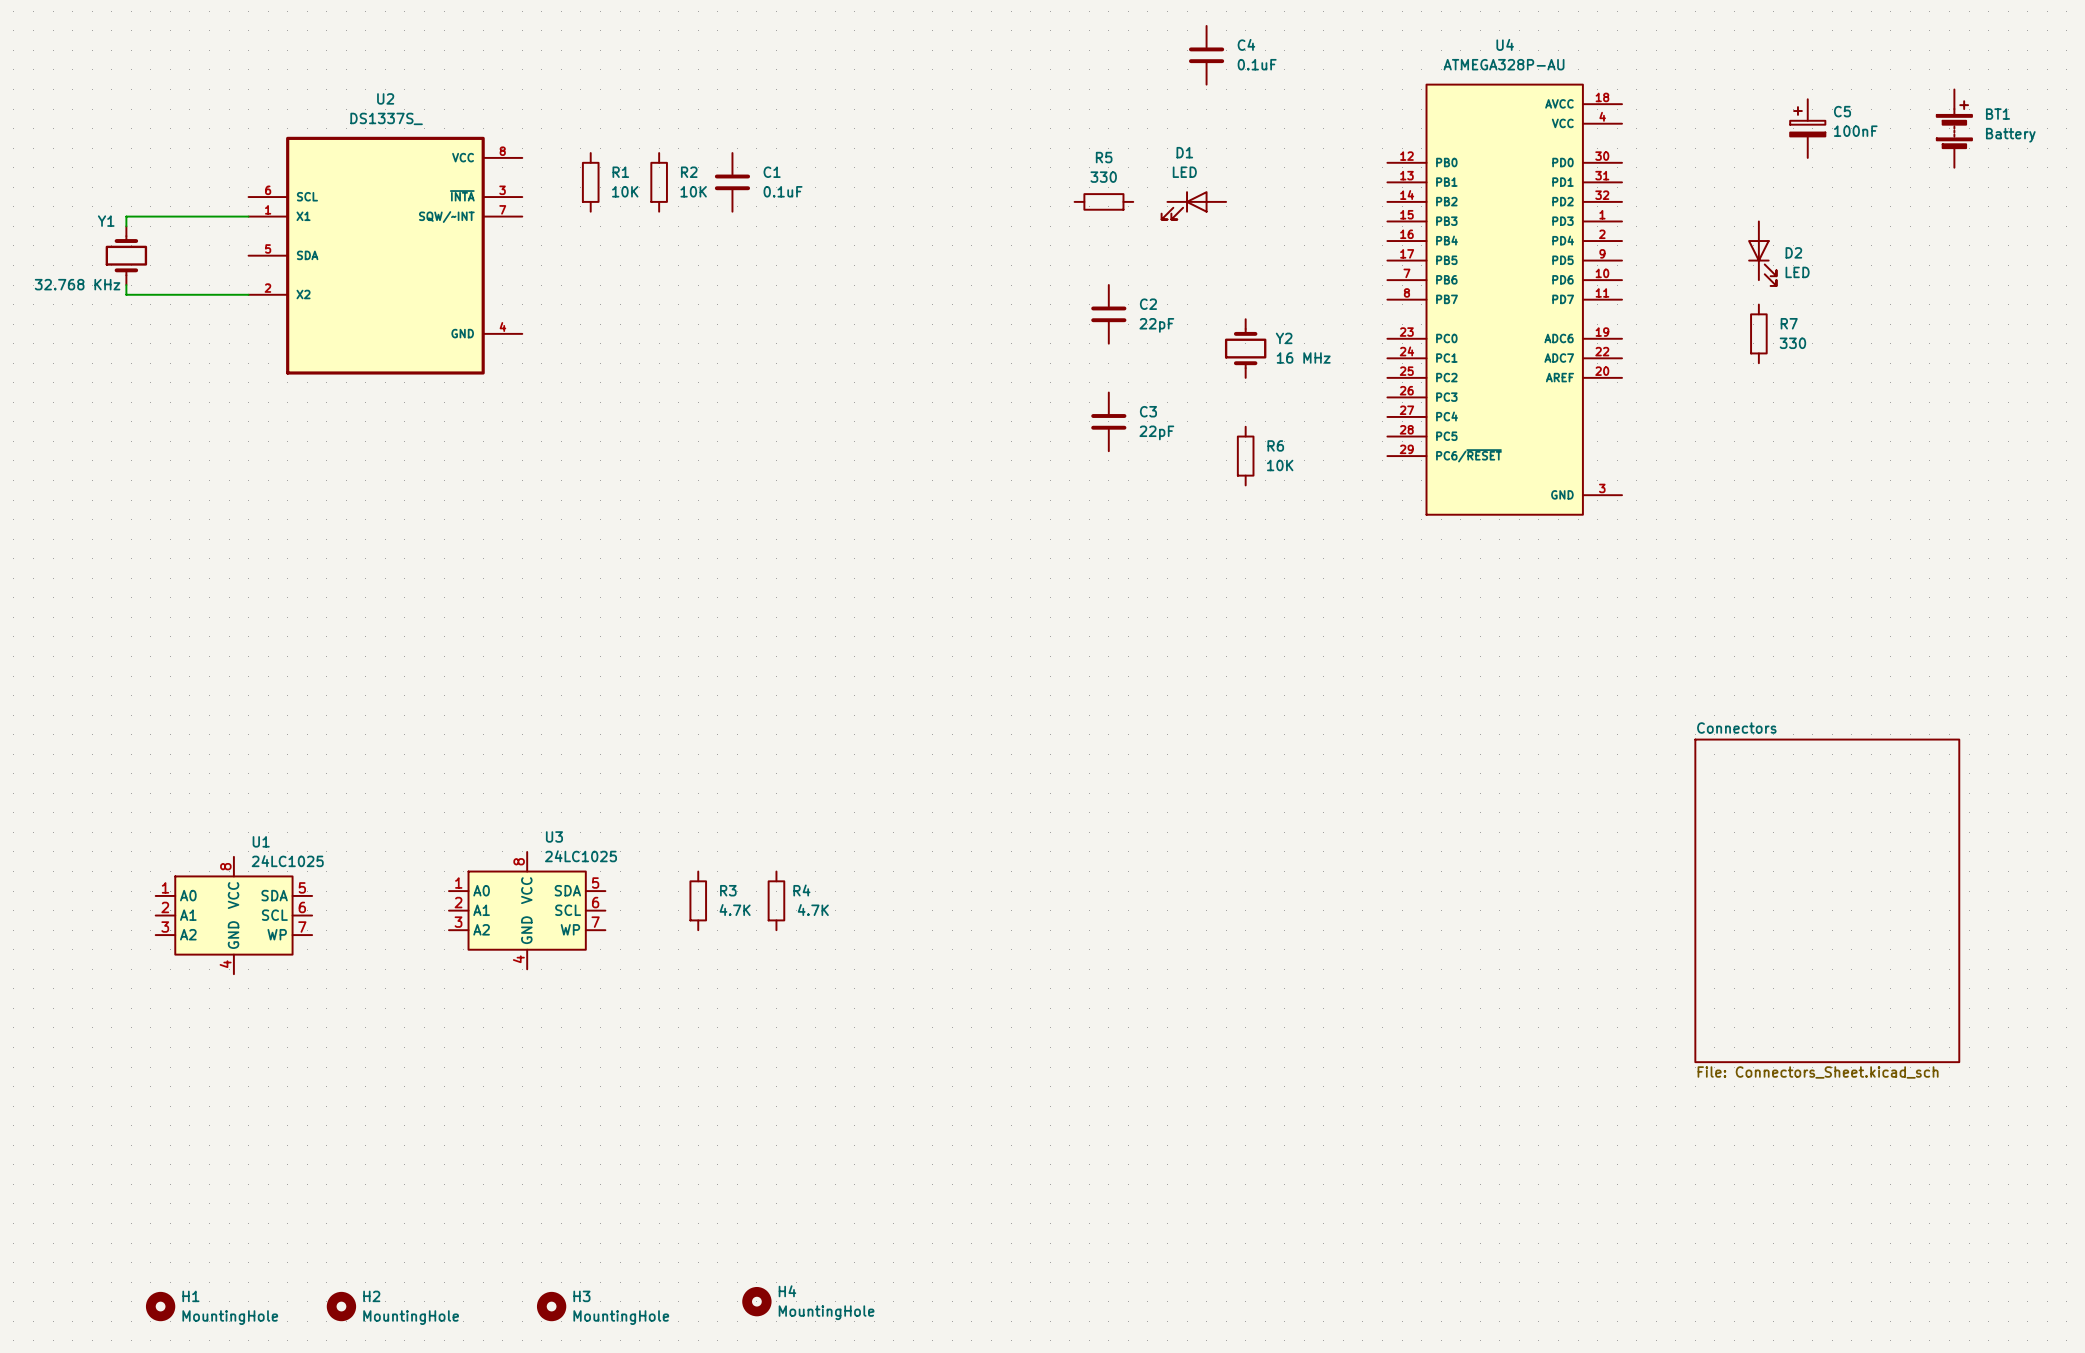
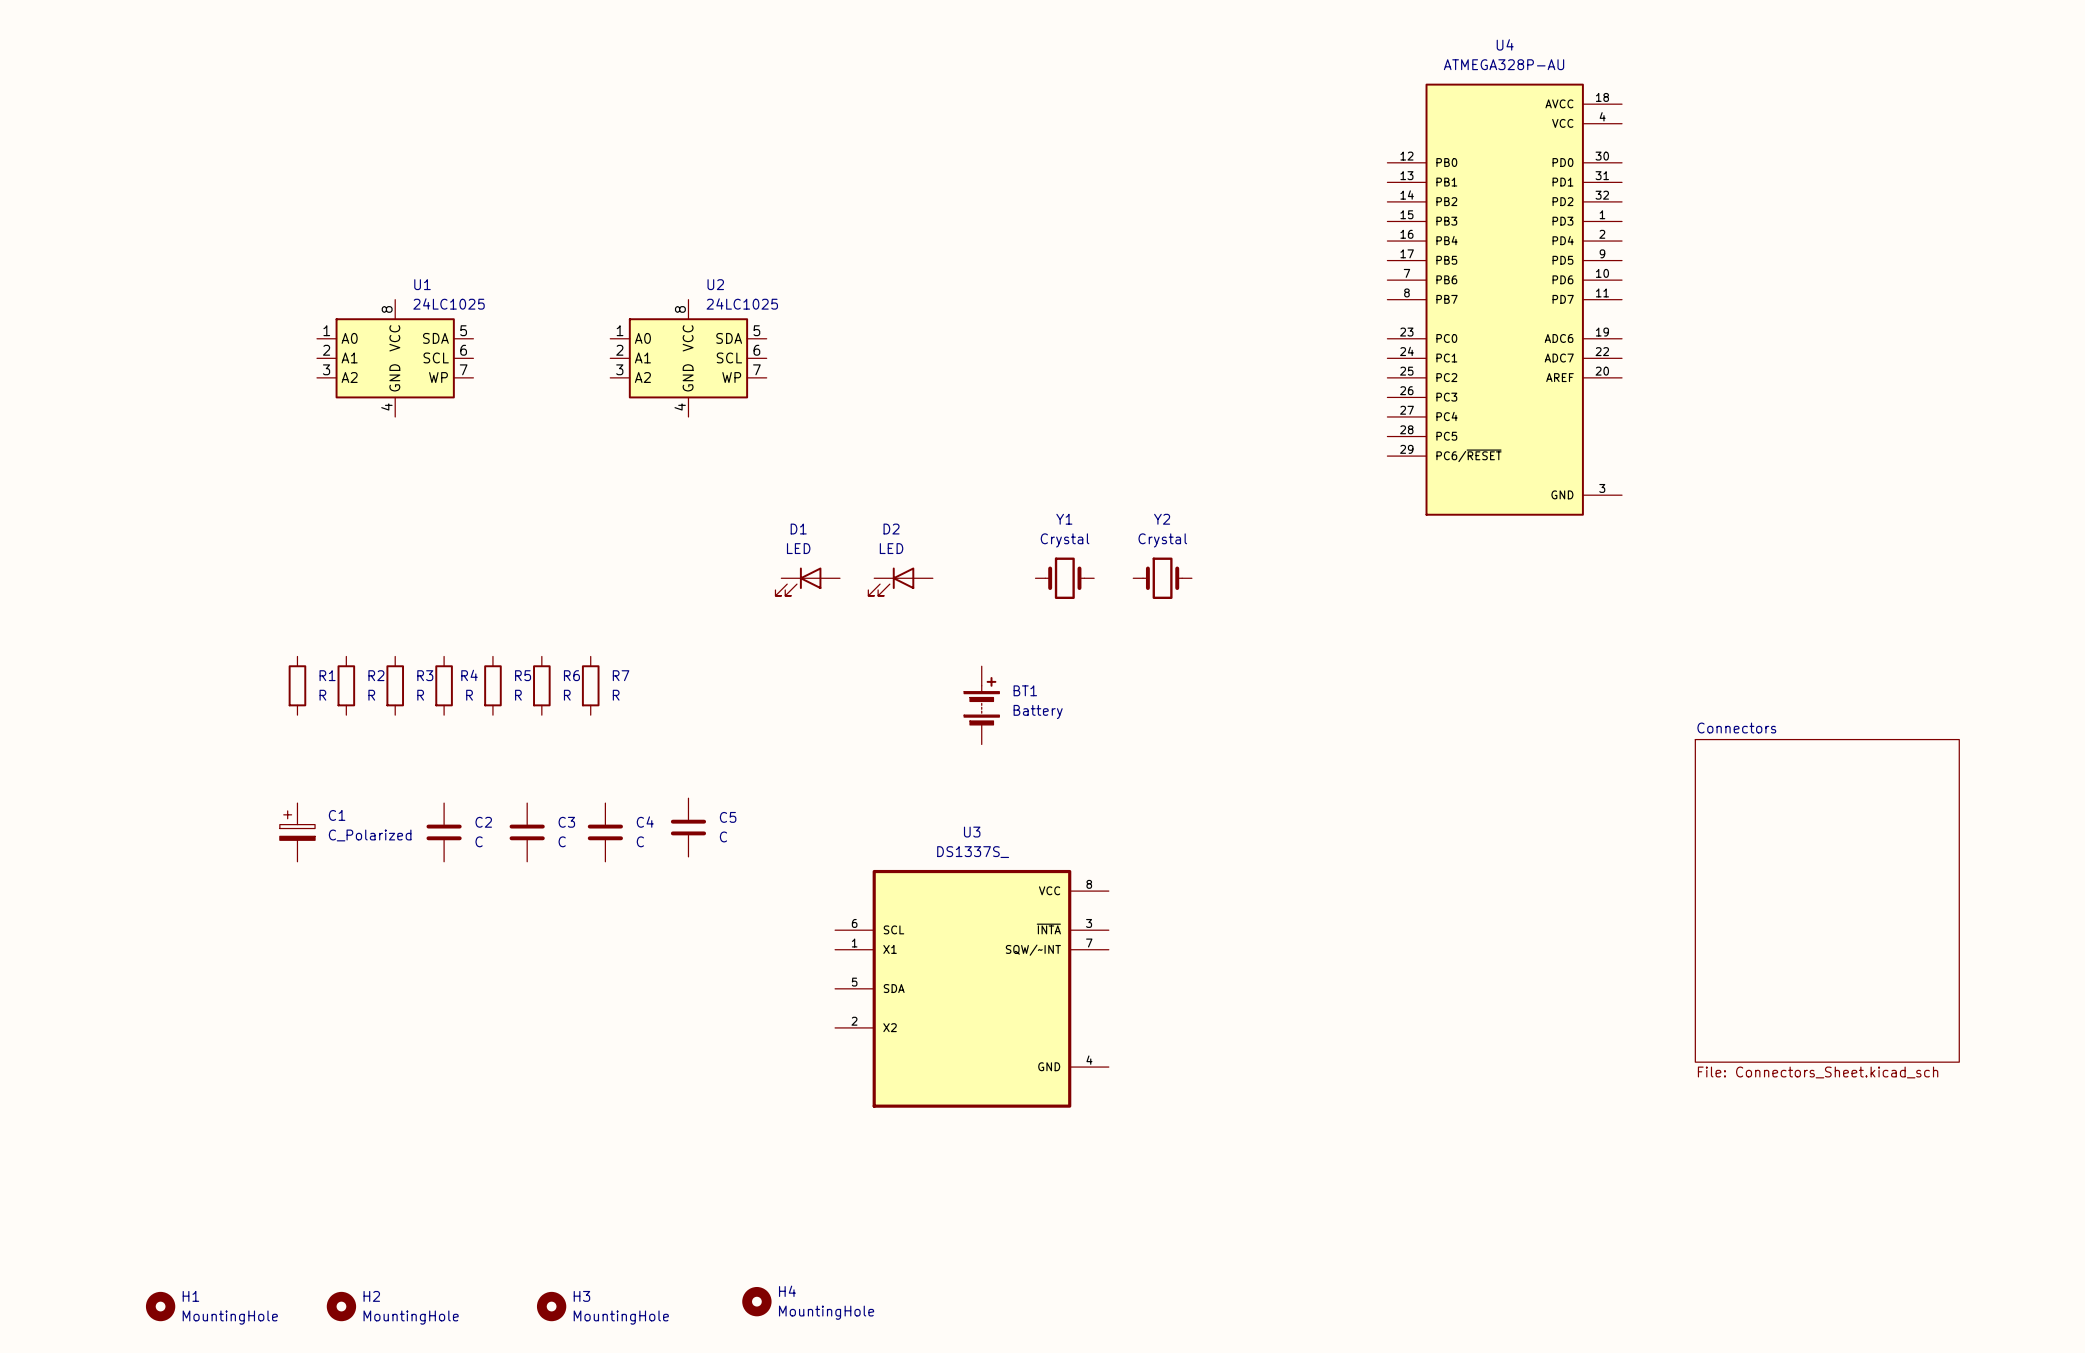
C4 position: (1206, 55) -> (605, 832)
C4 value: 0.1uF (1257, 64) -> C (640, 841)
U2 name position: U2 (385, 98) -> U2 (715, 284)
C5 symbol: [1790, 99, 1826, 158] -> [670, 798, 707, 857]
U2 value: DS1337S_ (386, 118) -> 24LC1025 (742, 303)
BT1 position: (1954, 128) -> (981, 705)
C5 value: 100nF (1855, 131) -> C (723, 836)
U2 symbol: [248, 136, 523, 375] -> [610, 299, 767, 417]
C1 symbol: [714, 153, 751, 212] -> [279, 803, 316, 862]
R5 name position: R5 (1104, 157) -> R5 (523, 675)
R5 value: 330 (1103, 177) -> R (518, 695)
R1 position: (590, 182) -> (297, 685)
R2 position: (659, 182) -> (346, 685)
R1 value: 10K (625, 191) -> R (322, 695)
R2 value: 10K (693, 191) -> R (371, 695)
C1 value: 0.1uF (783, 191) -> C_Polarized (370, 835)
R5 rotation: 0° (1103, 201) -> 90° clockwise (492, 685)
R5 position: (1103, 201) -> (492, 685)
D1 position: (1193, 205) -> (807, 581)
wire: (248, 216) (126, 216) (126, 226) -> none
Y1 name position: Y1 (106, 221) -> Y1 (1064, 519)
D2 name position: D2 (1793, 252) -> D2 (891, 529)
D2 position: (1762, 253) -> (900, 581)
Y1 rotation: 0° (126, 255) -> 90° clockwise (1064, 578)
Y1 position: (126, 255) -> (1064, 578)
D2 rotation: 0° (1762, 263) -> 90° clockwise (891, 581)
D2 value position: LED (1797, 272) -> LED (891, 548)
Y1 value: 32.768 KHz (77, 284) -> Crystal (1065, 540)
wire: (126, 285) (126, 294) (248, 294) -> none
C2 position: (1108, 314) -> (444, 832)
C2 value: 22pF (1156, 325) -> C (479, 841)
R7 position: (1758, 333) -> (590, 685)
Y2 name position: Y2 (1284, 338) -> Y2 (1162, 519)
R7 value: 330 (1792, 343) -> R (616, 695)
Y2 rotation: 0° (1245, 348) -> 90° clockwise (1162, 578)
Y2 position: (1245, 348) -> (1162, 578)
Y2 value: 16 MHz (1303, 357) -> Crystal (1162, 540)
C3 position: (1108, 421) -> (527, 832)
C3 value: 22pF (1156, 432) -> C (562, 841)
R6 position: (1245, 456) -> (541, 685)
R6 value: 10K (1280, 465) -> R (567, 695)
U3 name position: U3 (554, 836) -> U3 (972, 832)
U3 symbol: [448, 851, 606, 970] -> [835, 869, 1109, 1108]
U3 value: 24LC1025 (580, 856) -> DS1337S_ (973, 852)
R3 position: (698, 900) -> (395, 685)
R4 position: (776, 900) -> (444, 685)
R3 value: 4.7K (735, 910) -> R (420, 695)
R4 value: 4.7K (813, 910) -> R (469, 695)
U1 position: (233, 915) -> (395, 358)

